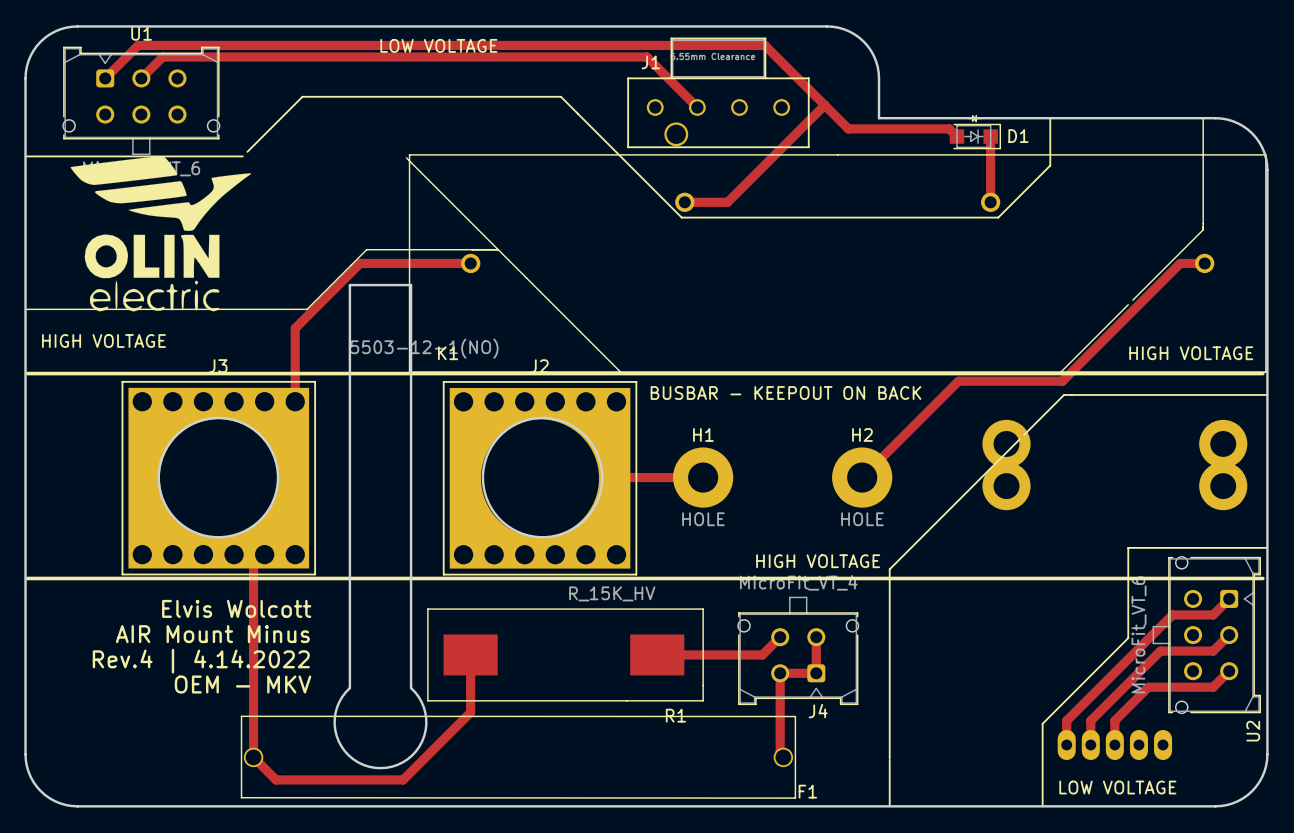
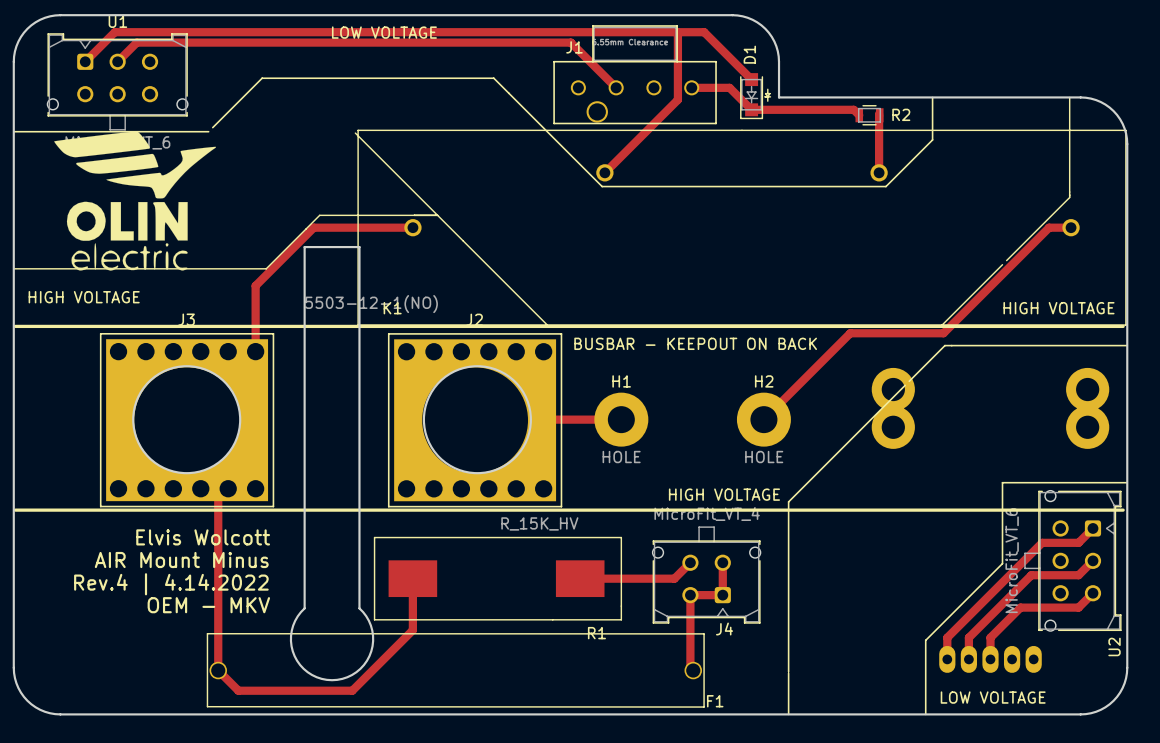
track: (764, 45) (848, 128) (949, 128) (956, 136) -> (676, 32) (704, 32) (751, 79)
track: (824, 105) (727, 202) (684, 202) -> (676, 32) (677, 99) (604, 172)
track: none -> (691, 87) (729, 87) (751, 109) (853, 109) (859, 115)
D1 rotation: 0° (975, 132) -> 90° clockwise (755, 96)
D1 position: (975, 132) -> (755, 96)
D1 name position: D1 (1018, 136) -> D1 (749, 54)
R2: none -> (869, 115)

